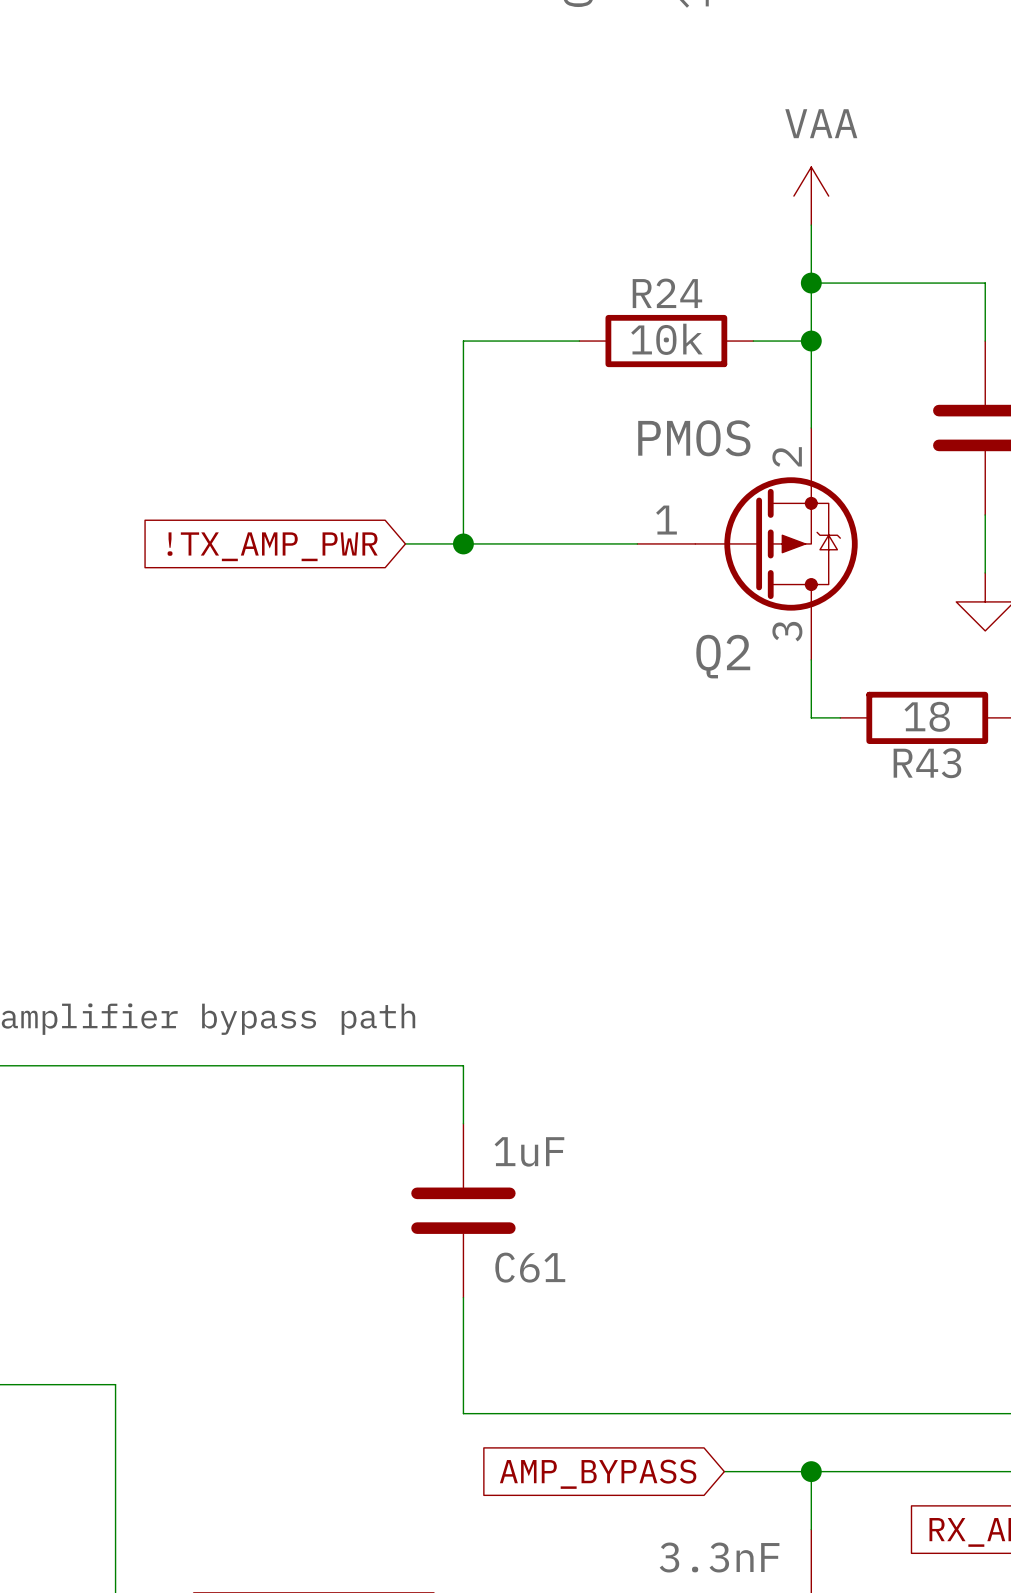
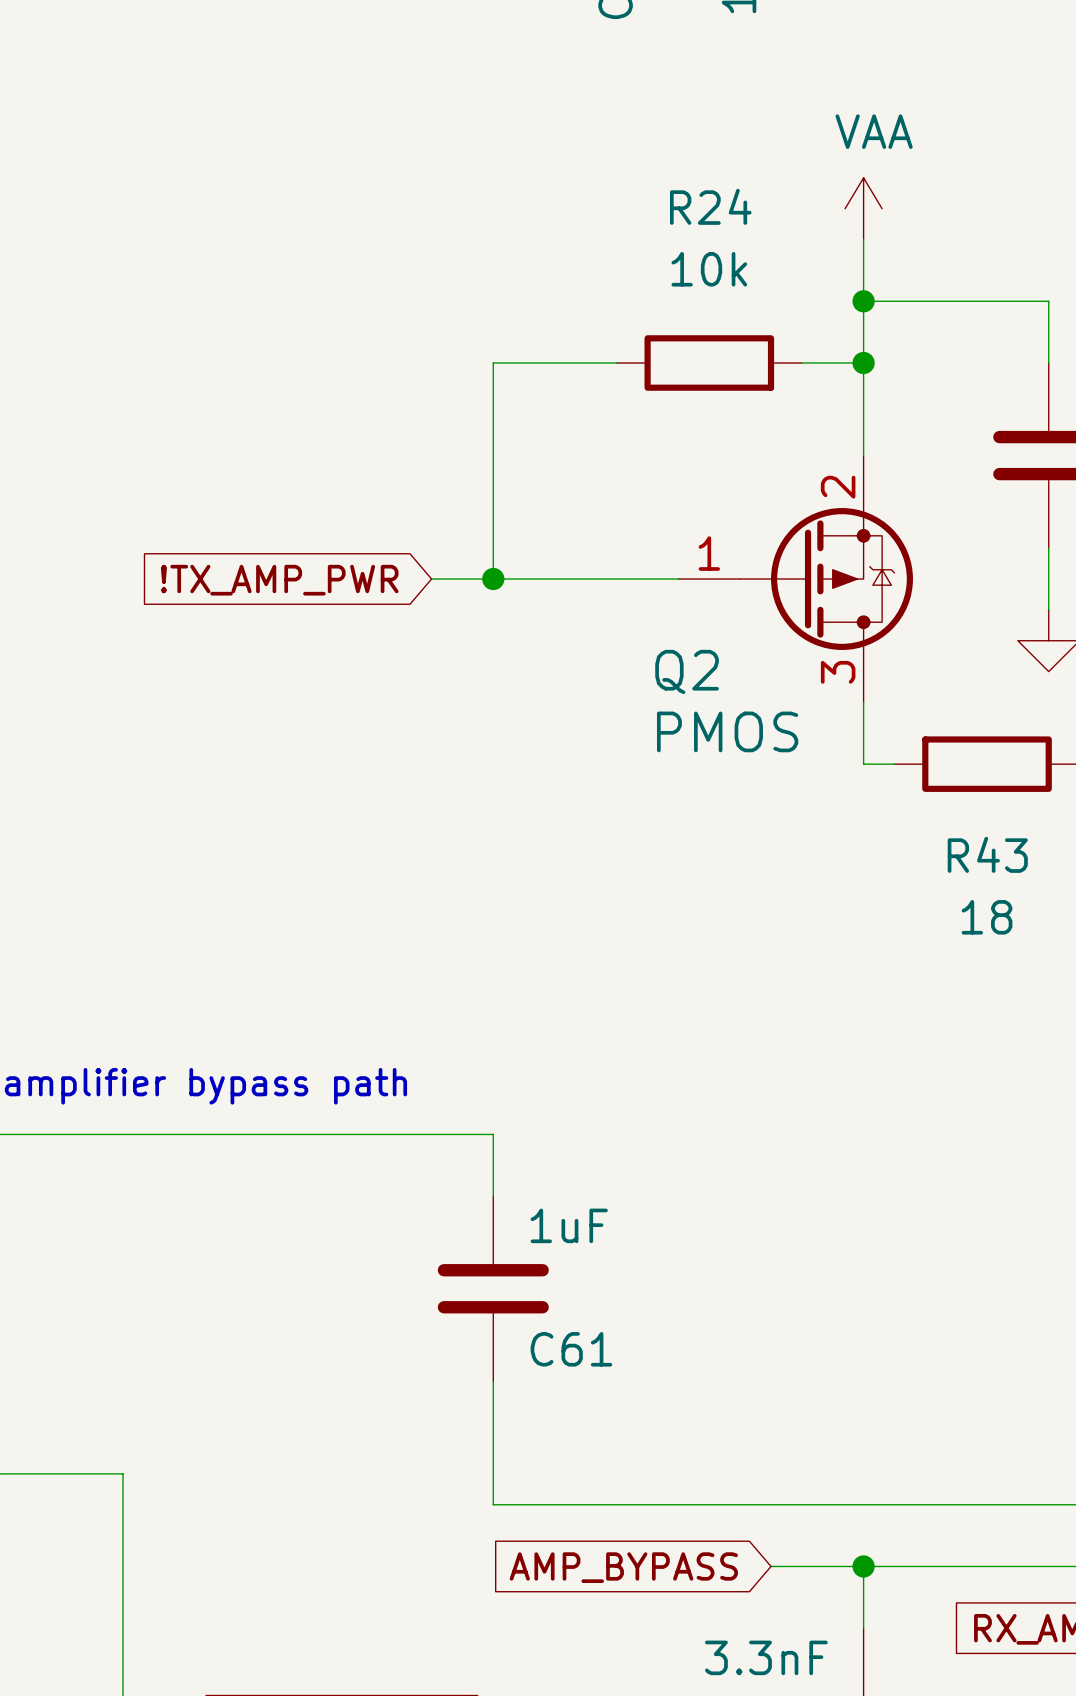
R24 name position: R24 (667, 293) -> R24 (710, 206)
R24 value position: 10k (666, 339) -> 10k (709, 269)
Q2 value position: PMOS (694, 438) -> PMOS (727, 731)
Q2 name position: Q2 (723, 656) -> Q2 (687, 671)
R43 value position: 18 (927, 716) -> 18 (987, 917)
R43 name position: R43 (927, 763) -> R43 (987, 854)

